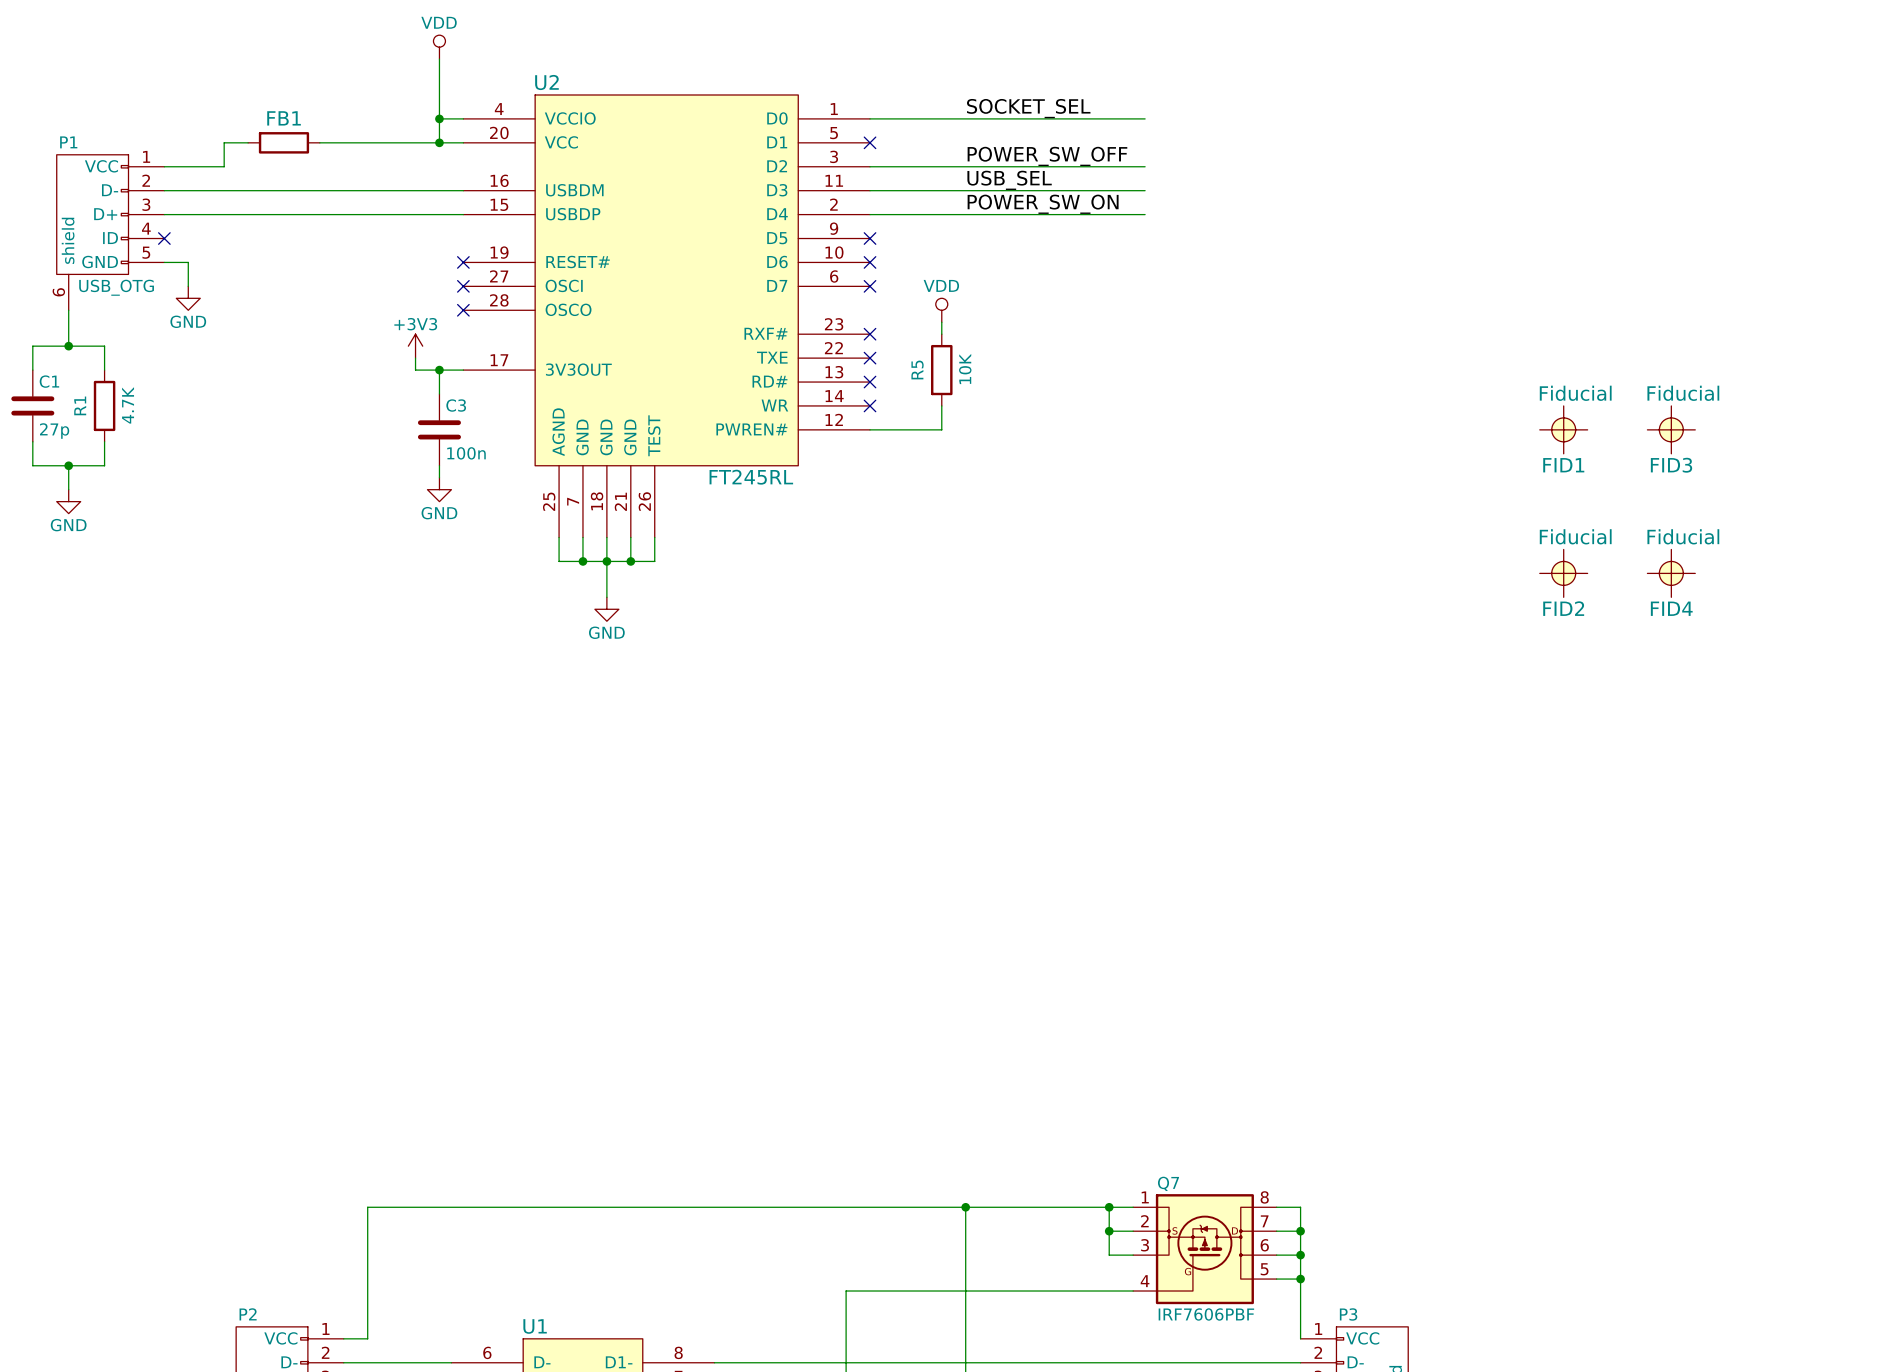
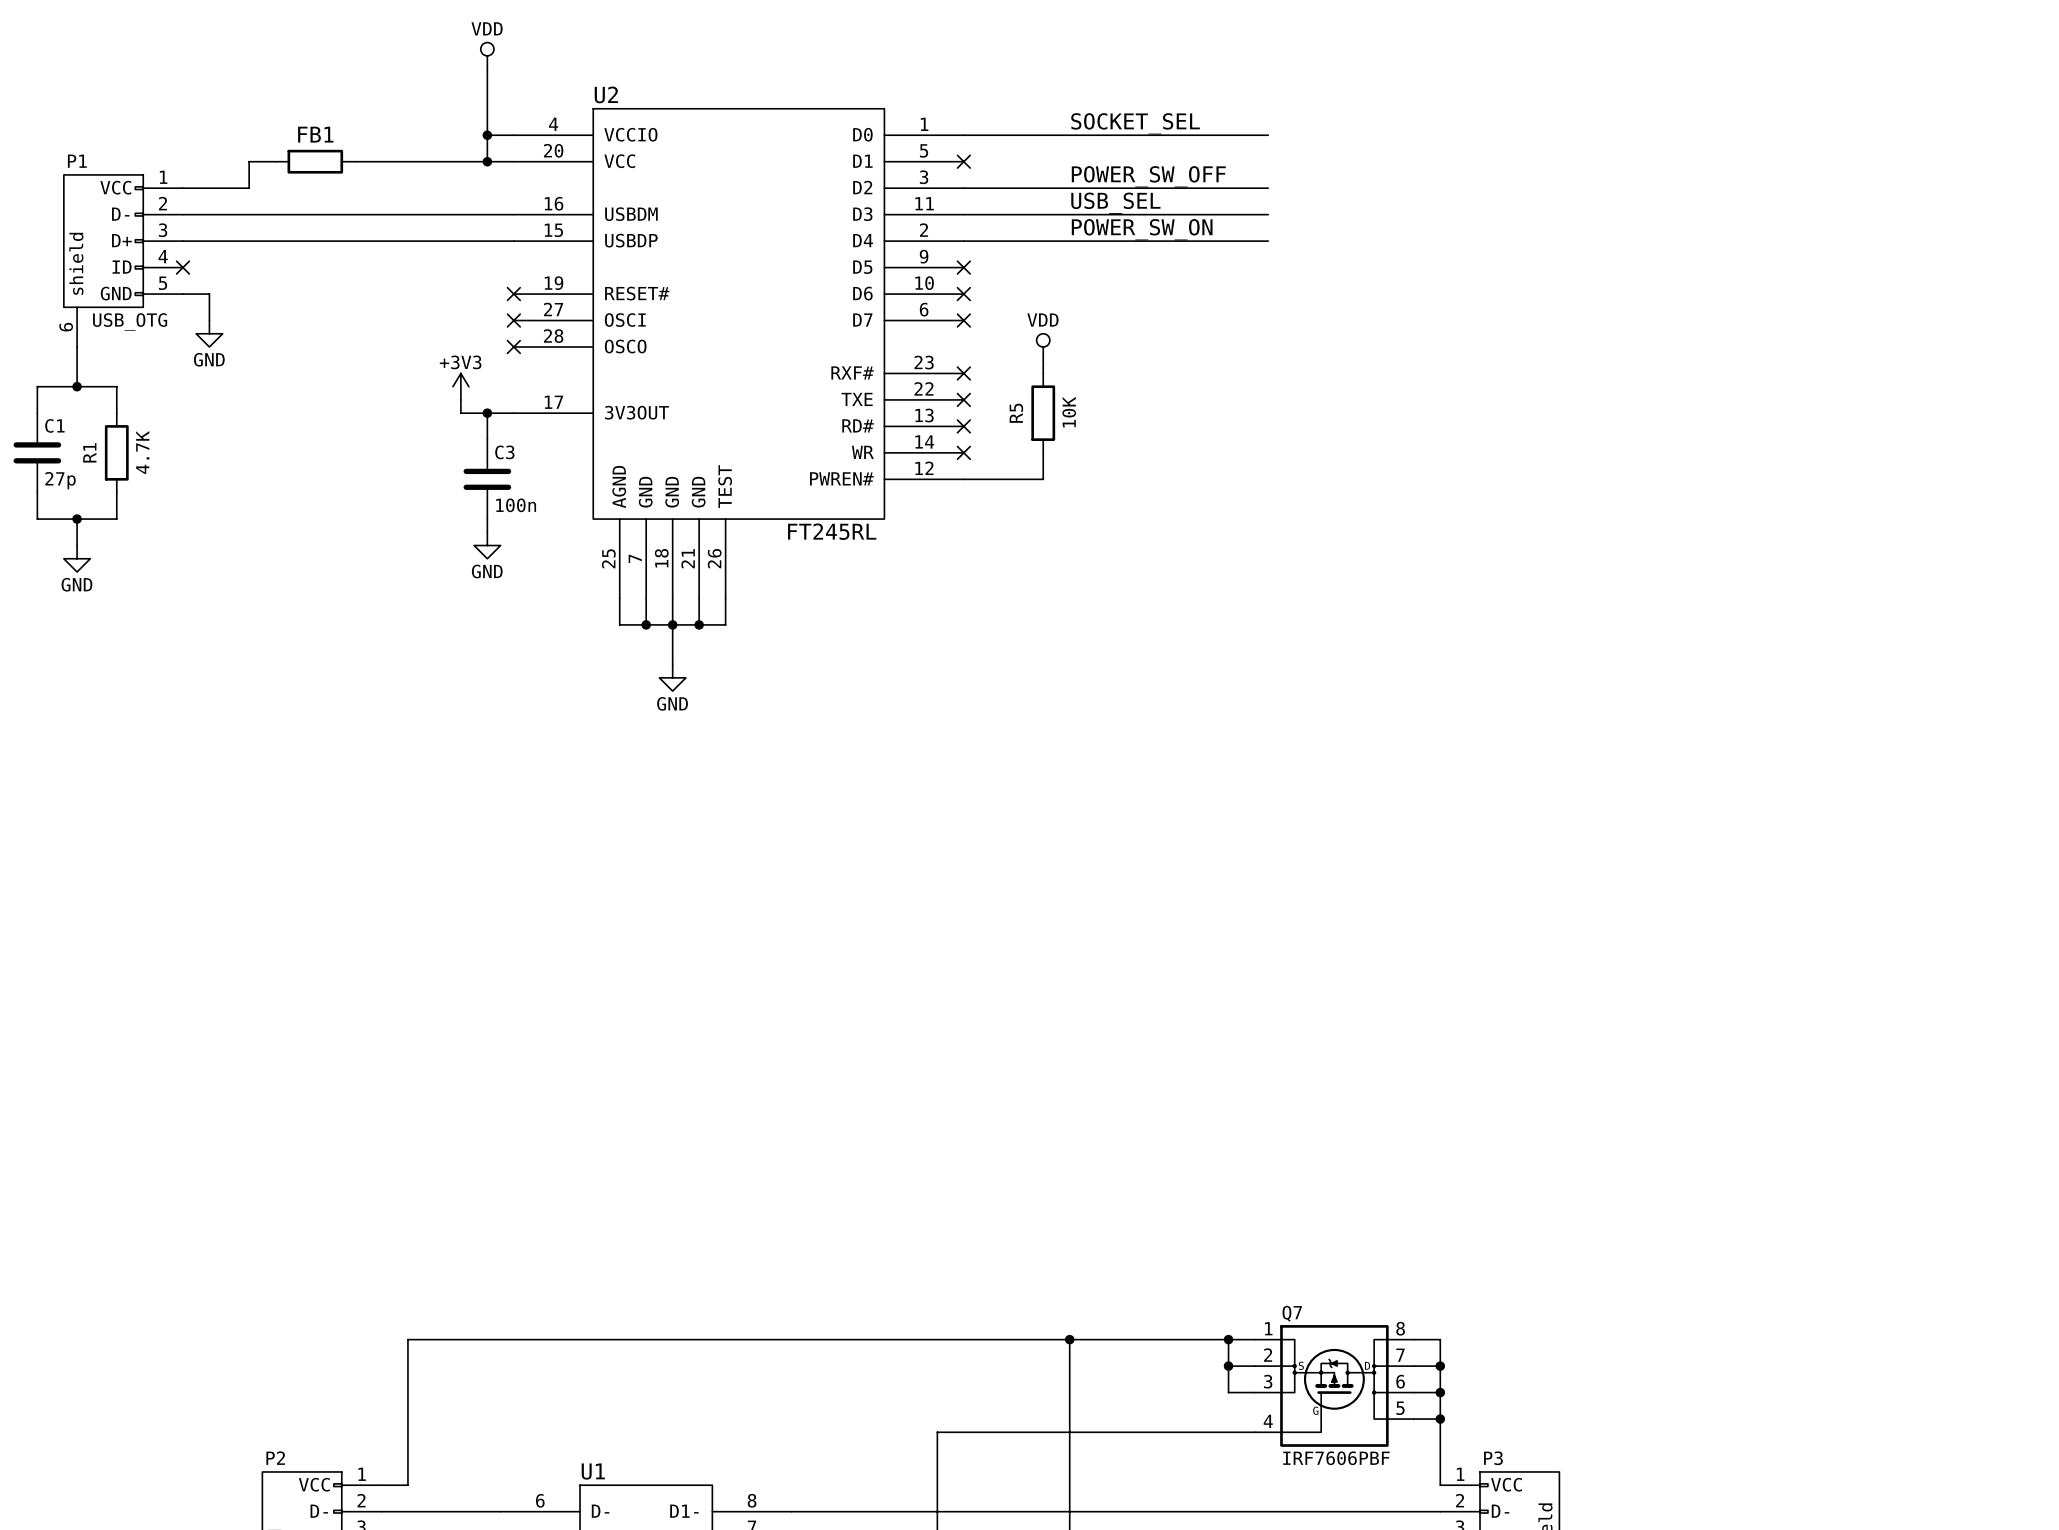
FID1: Fiducial (1563, 429) -> none
FID3: Fiducial (1671, 429) -> none
FID2: Fiducial (1563, 573) -> none
FID4: Fiducial (1671, 573) -> none

